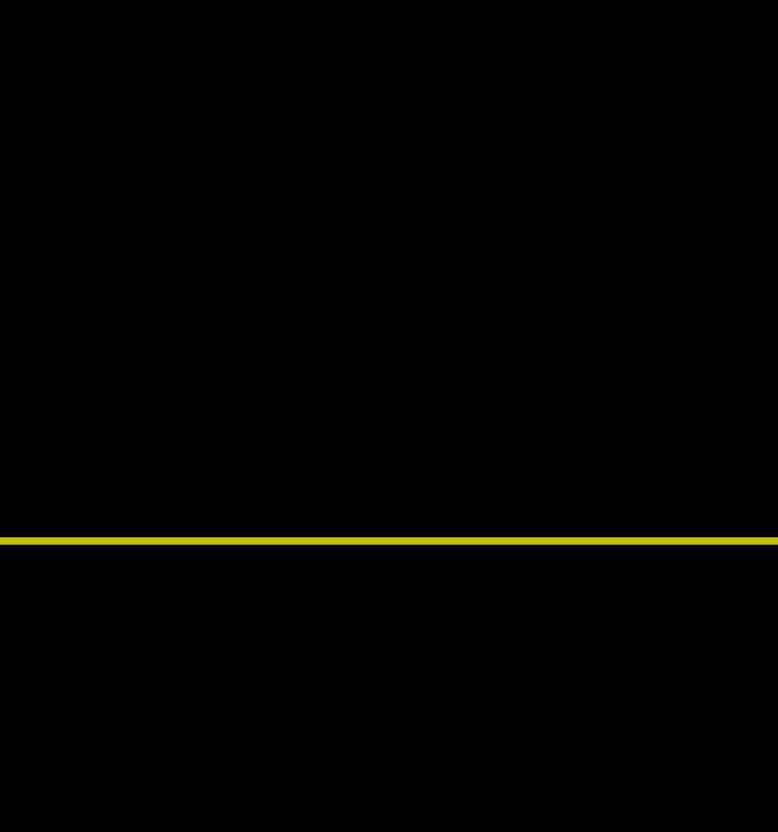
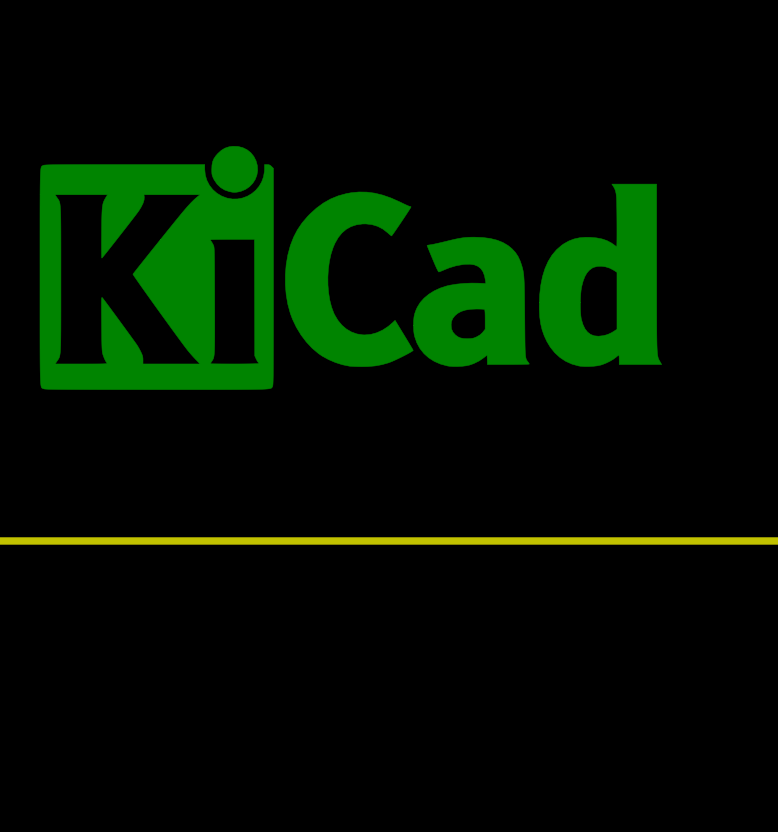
drawing: none -> [39, 146, 662, 390]

